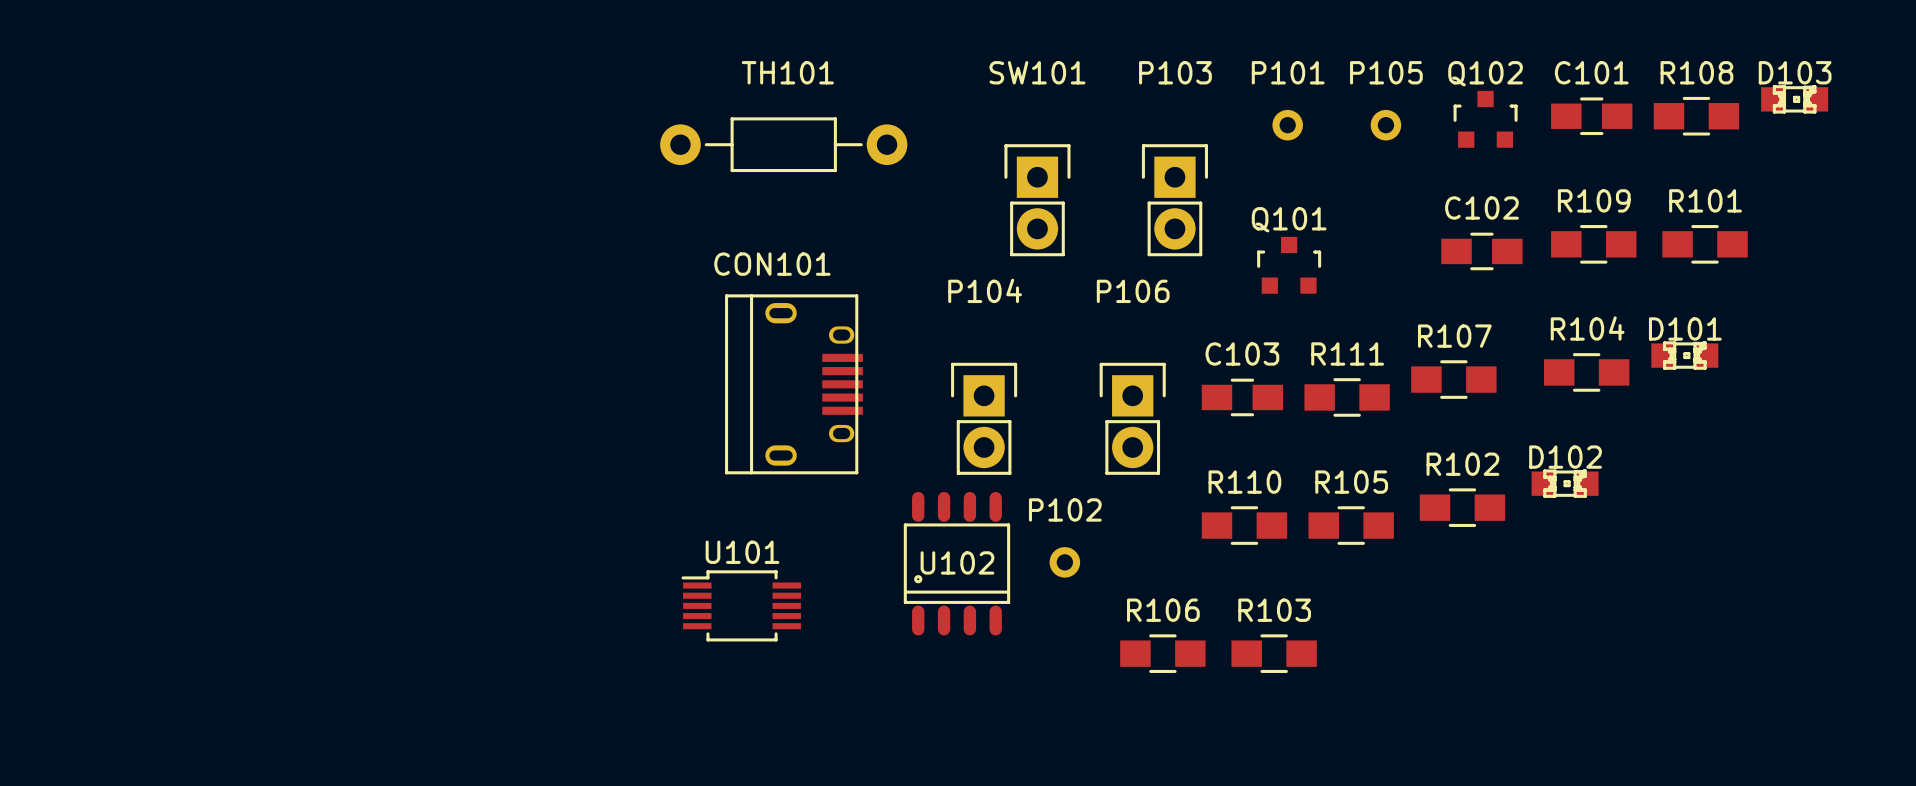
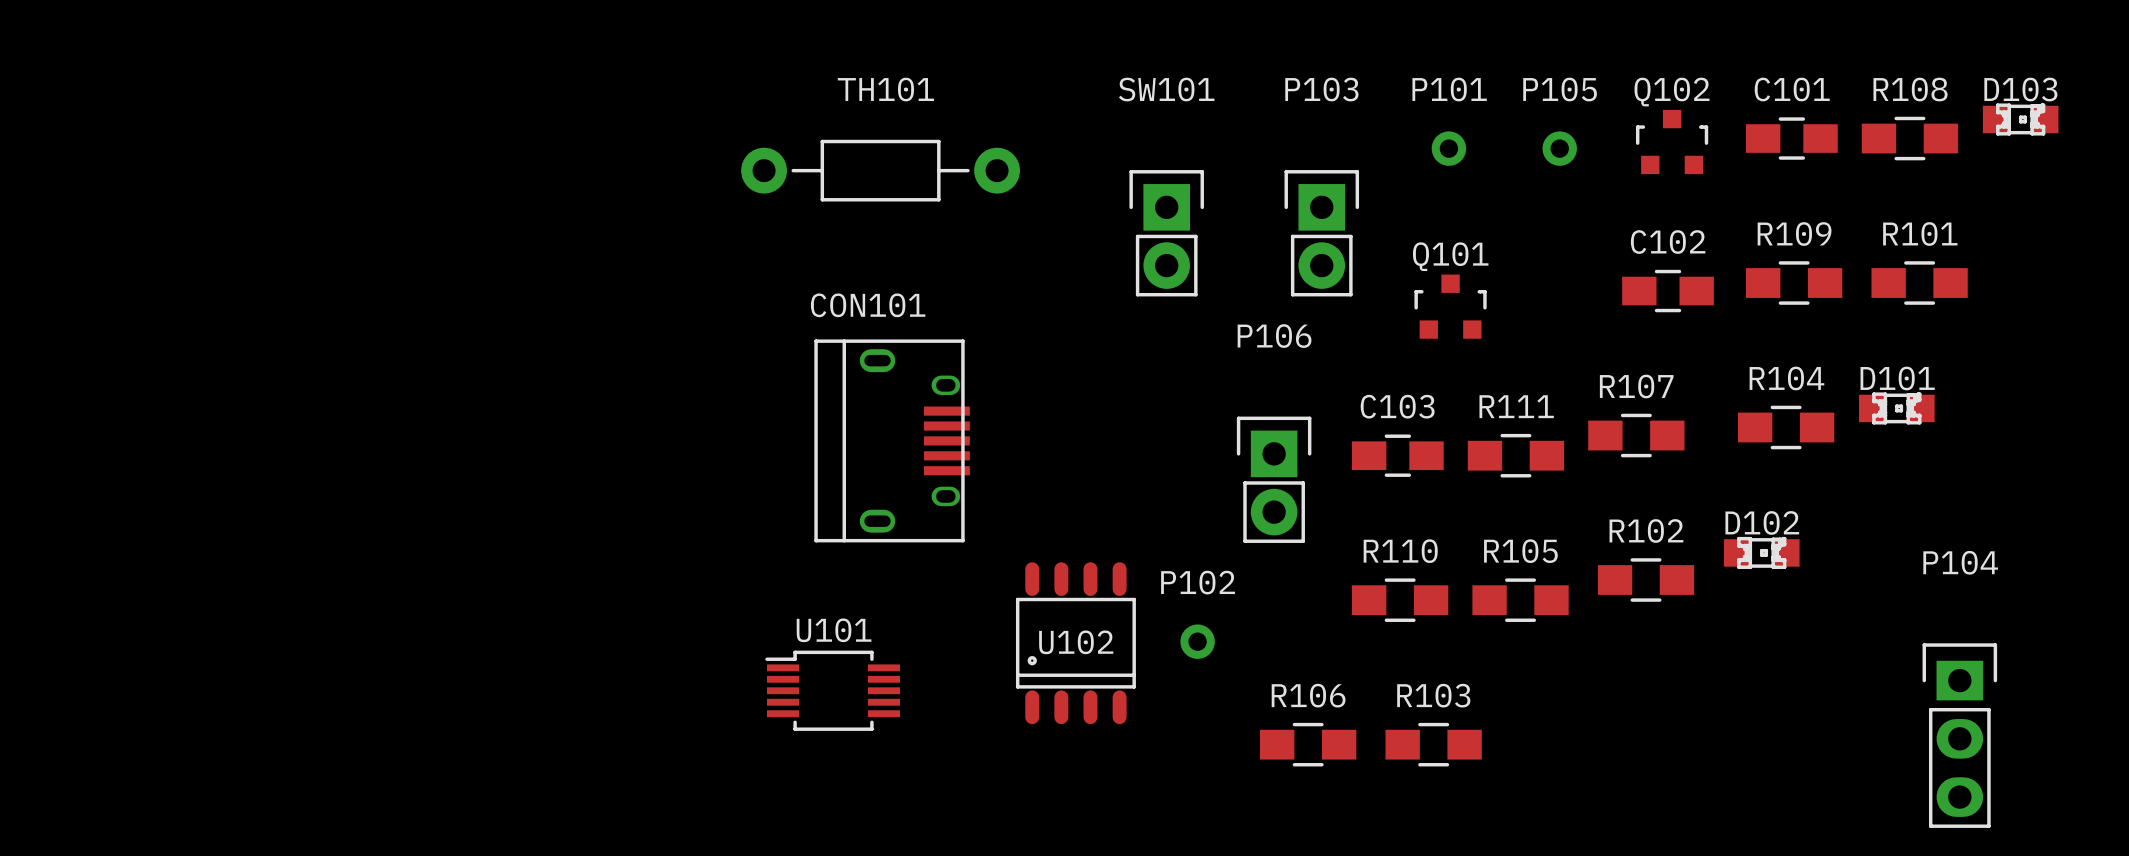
P104 footprint: [951, 362, 1018, 475] -> [1922, 643, 1998, 828]

